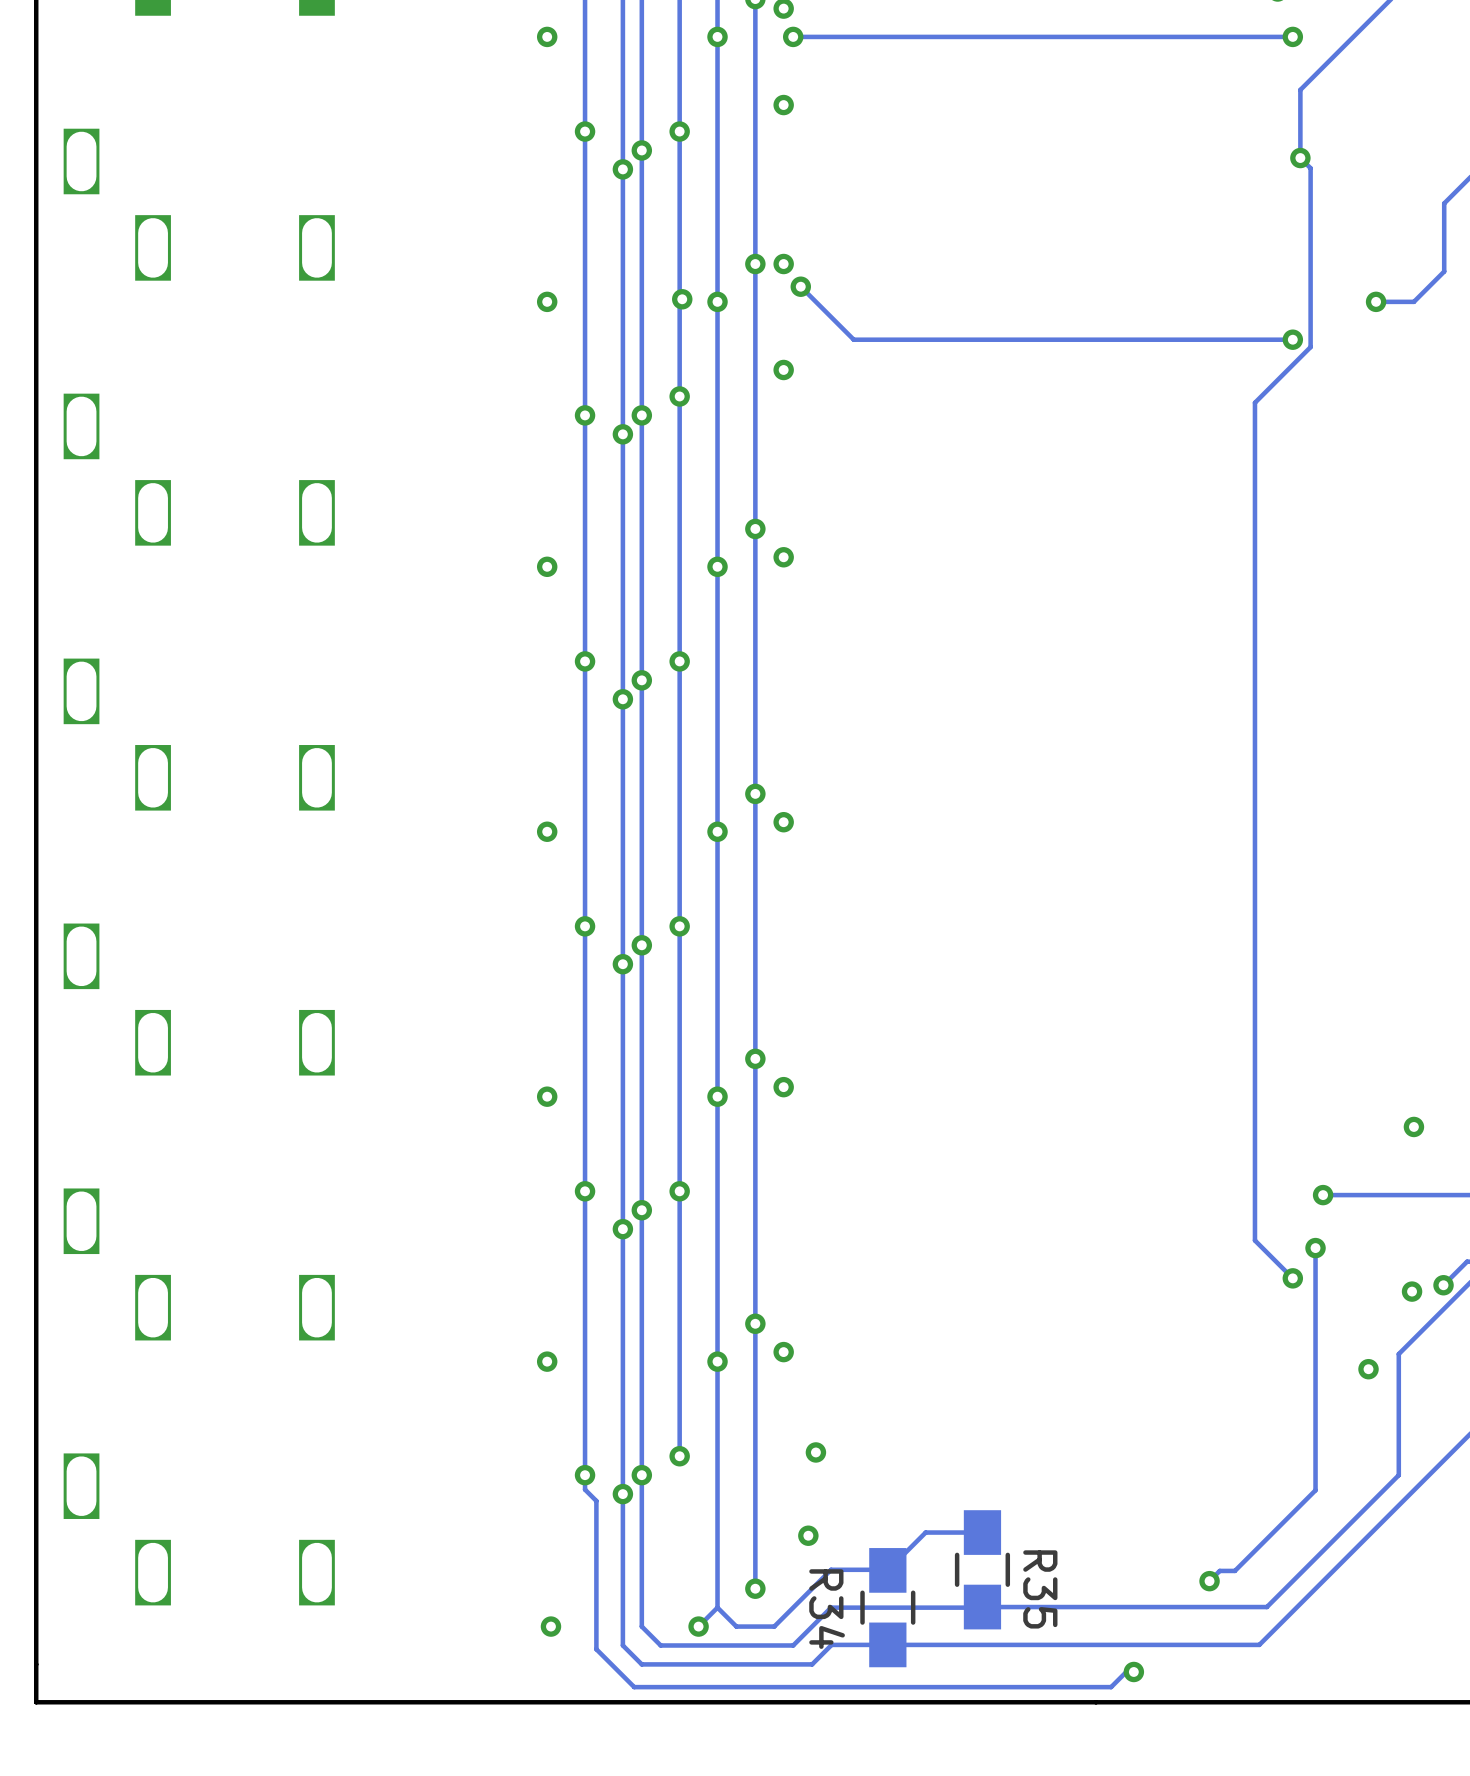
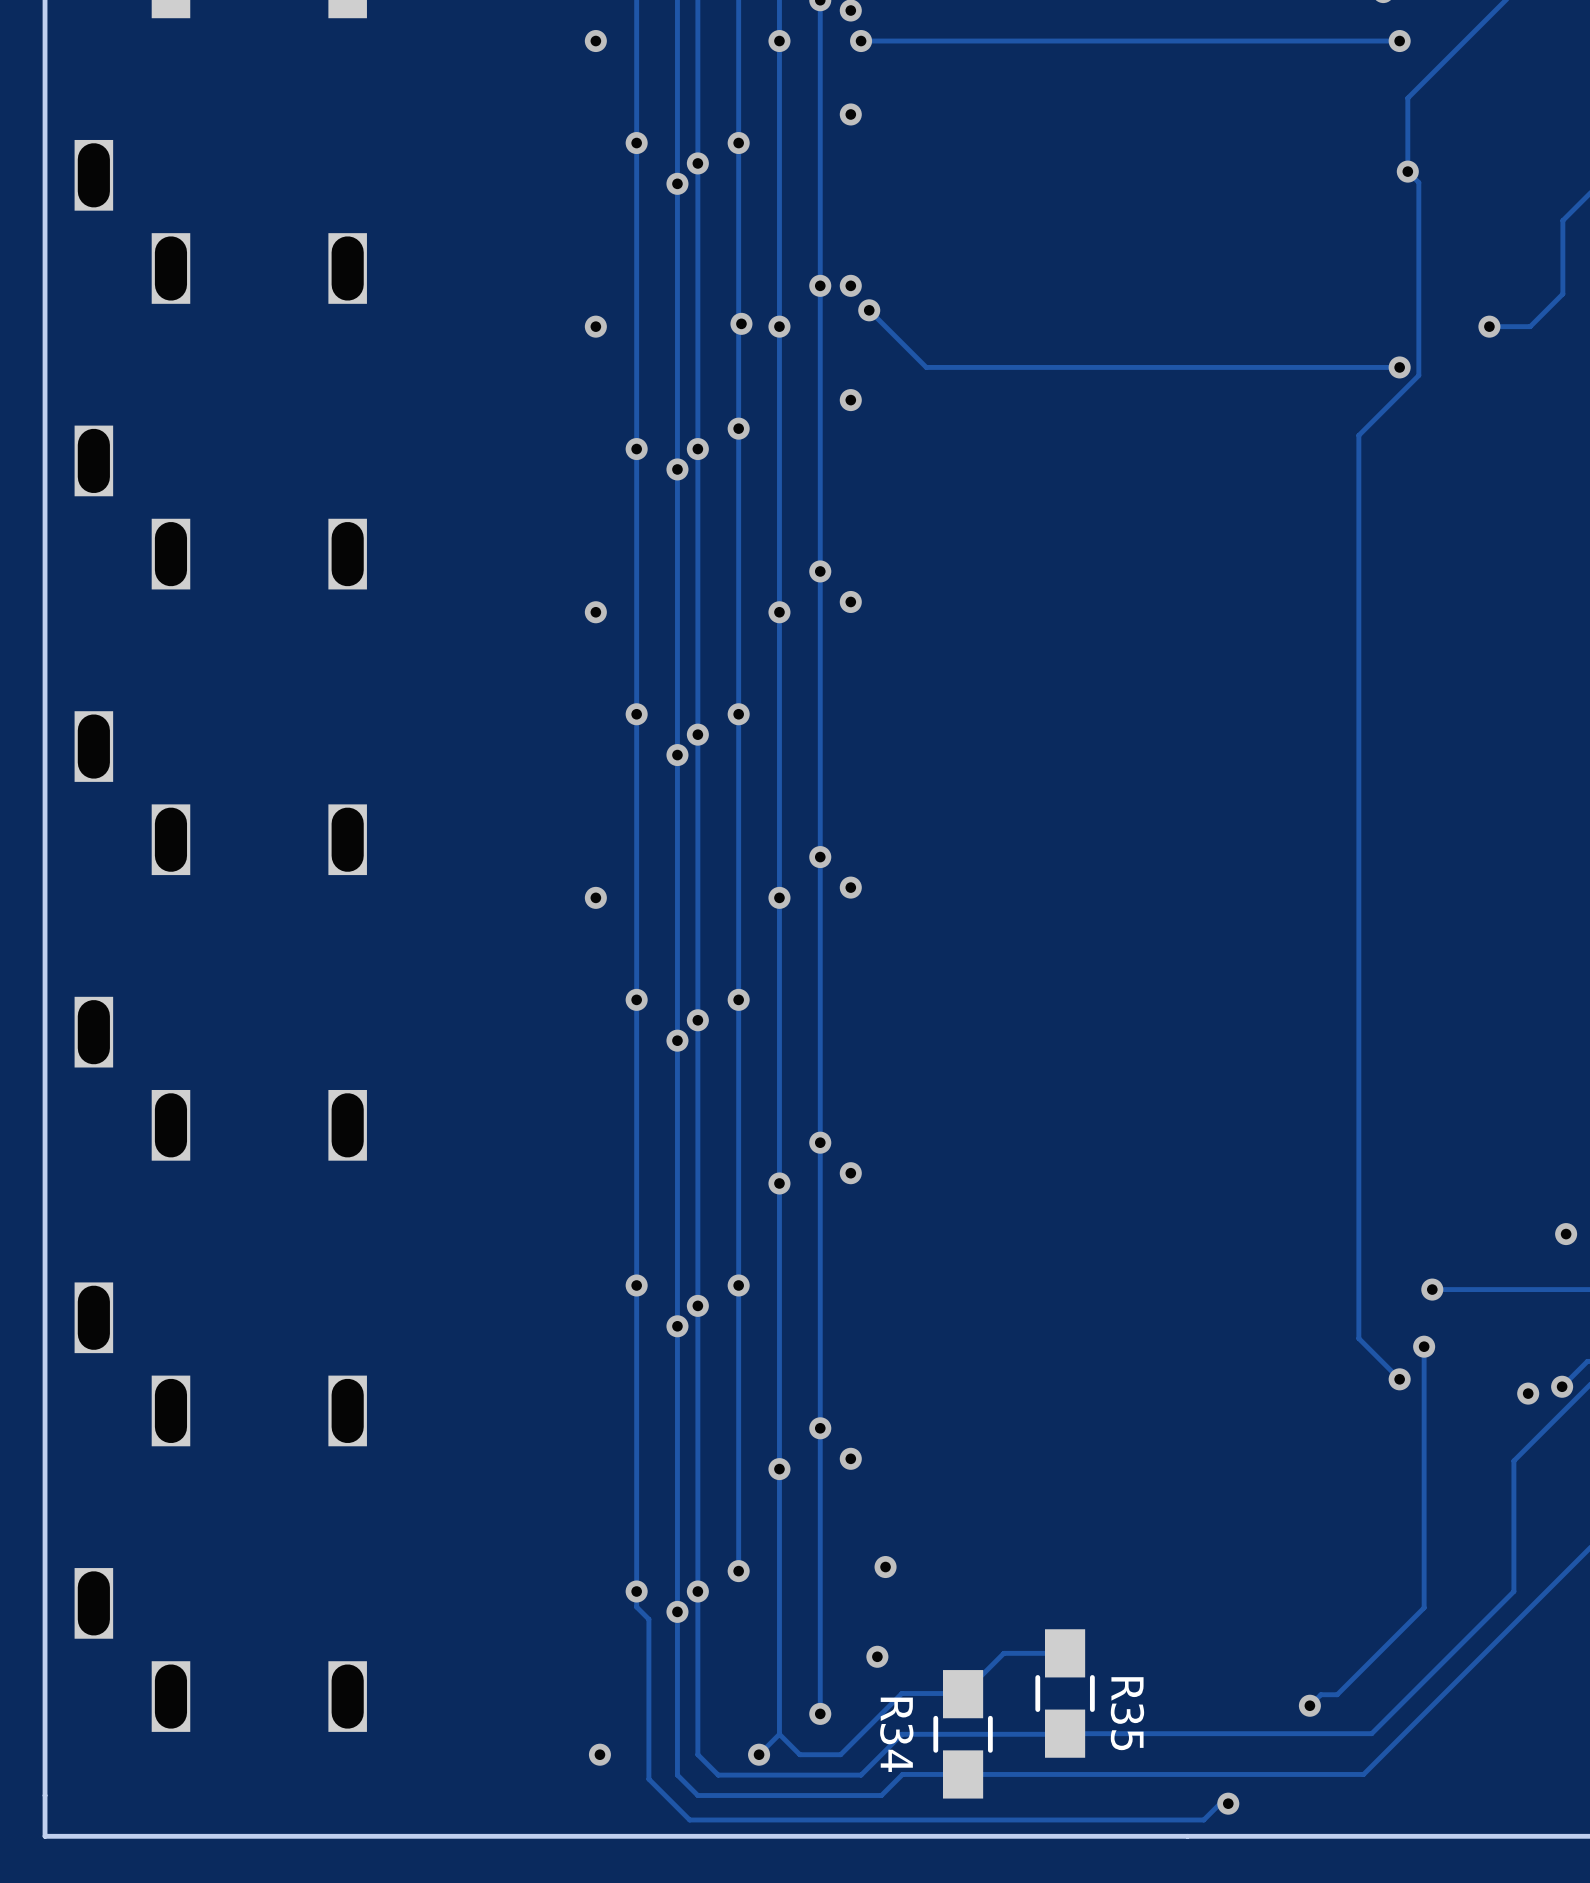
via: (547, 1096) -> none
via position: (1413, 1126) -> (1566, 1234)
via: (547, 1361) -> none
via: (1368, 1369) -> none

